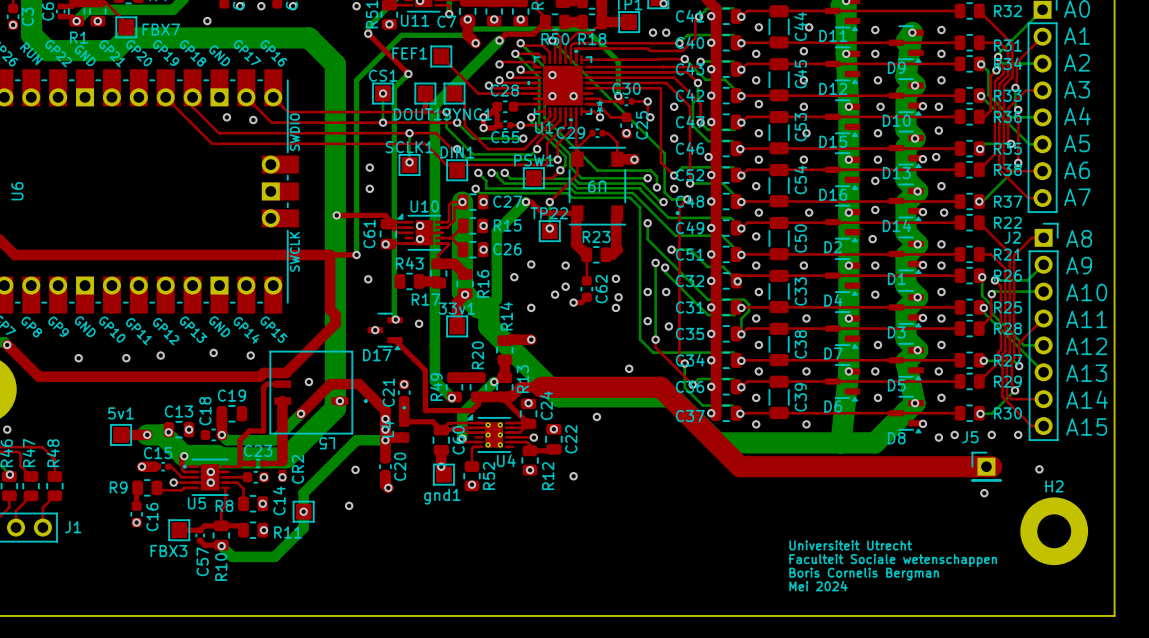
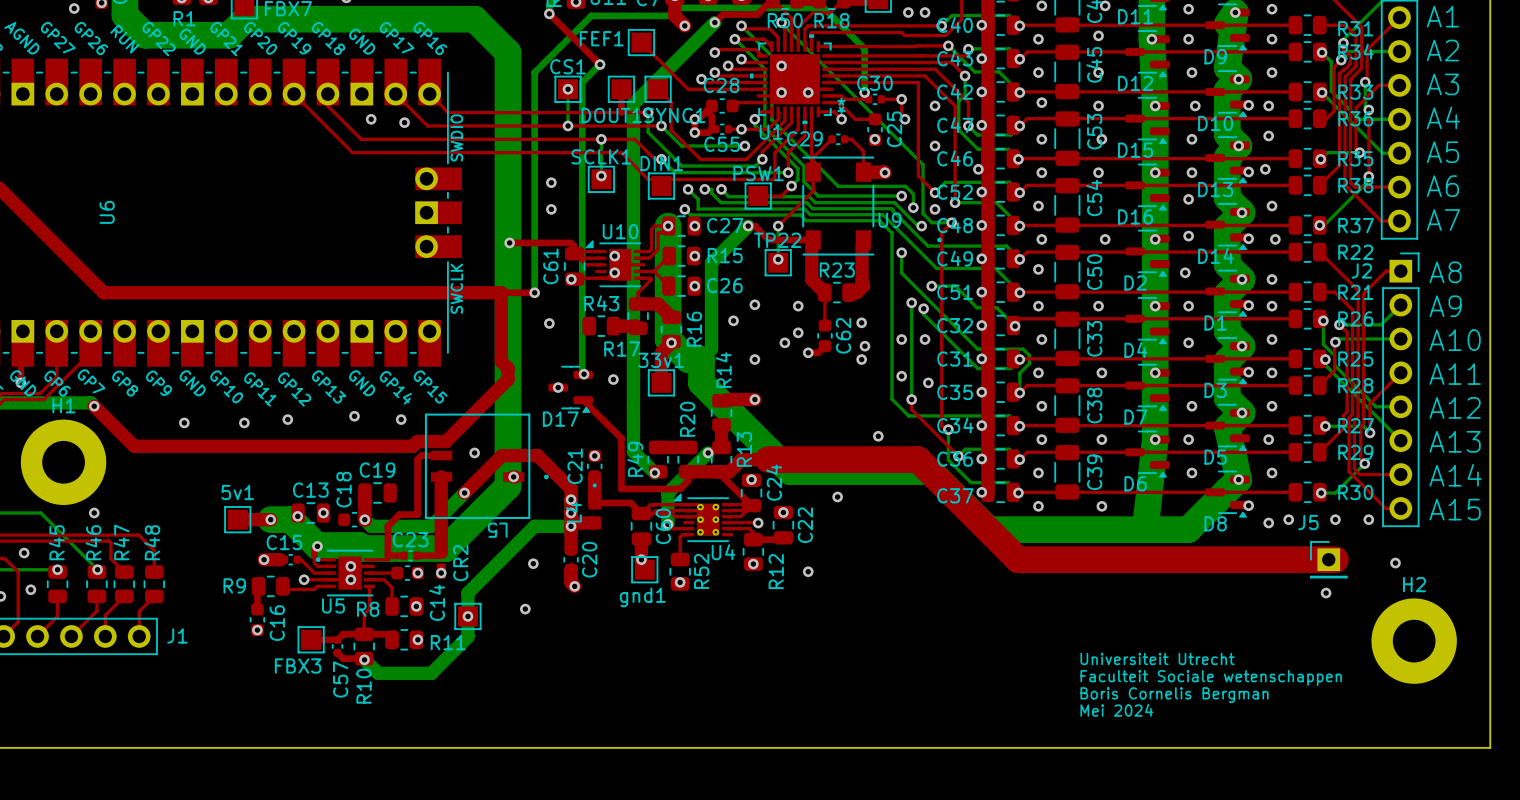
U9 name rotation: 0° (597, 186) -> 180° (889, 220)
U9 name position: U9 (597, 186) -> U9 (889, 220)

